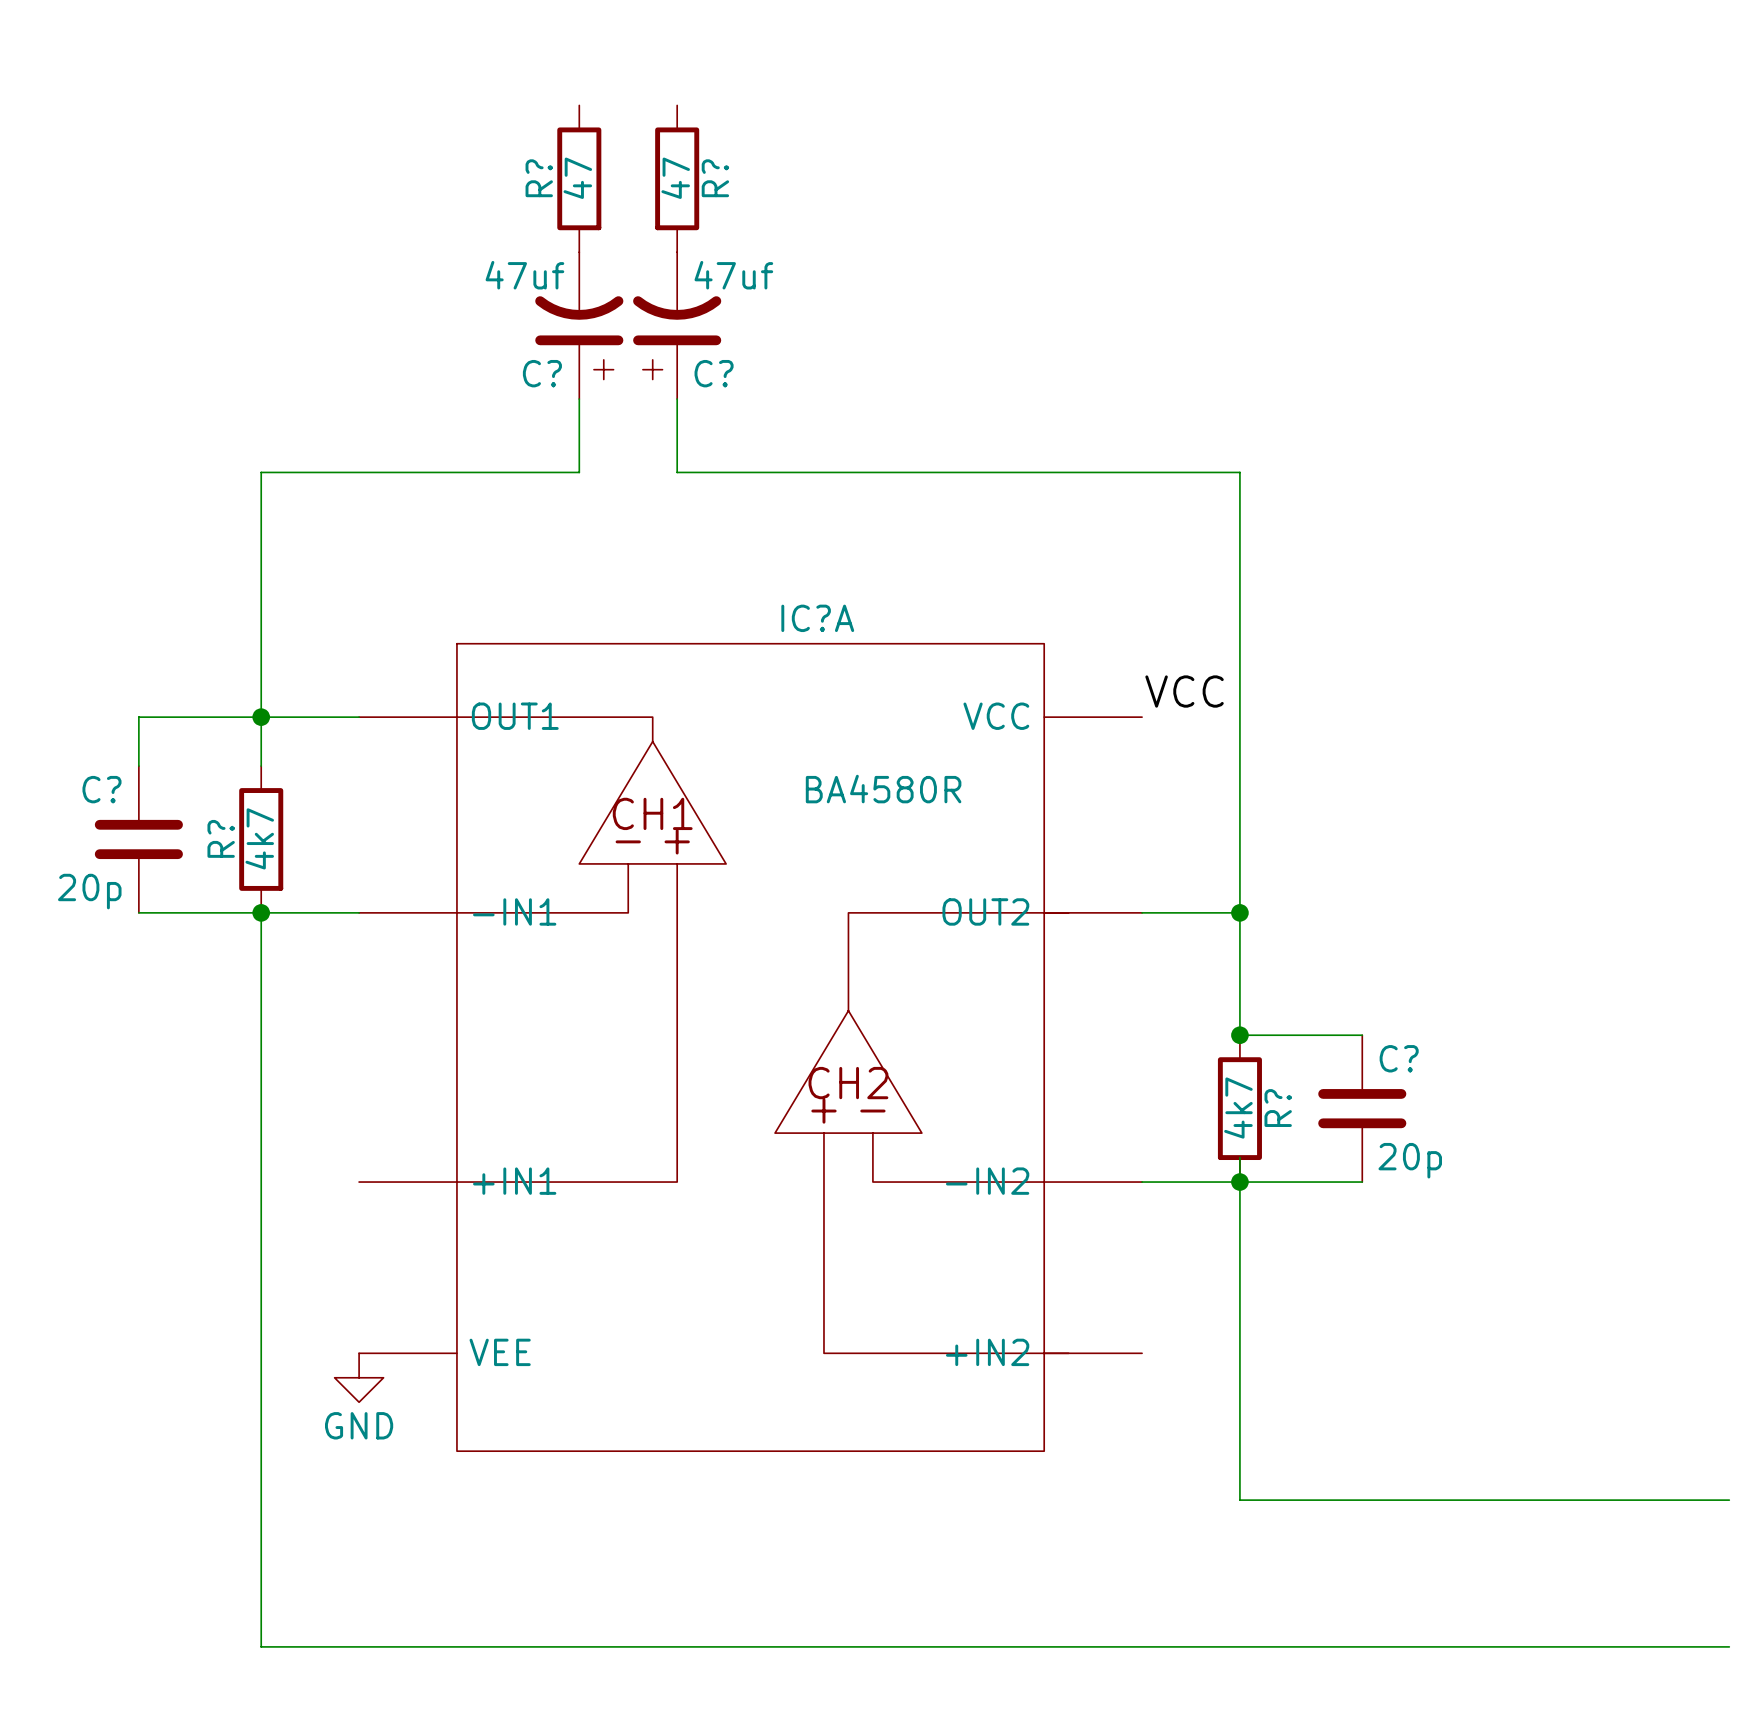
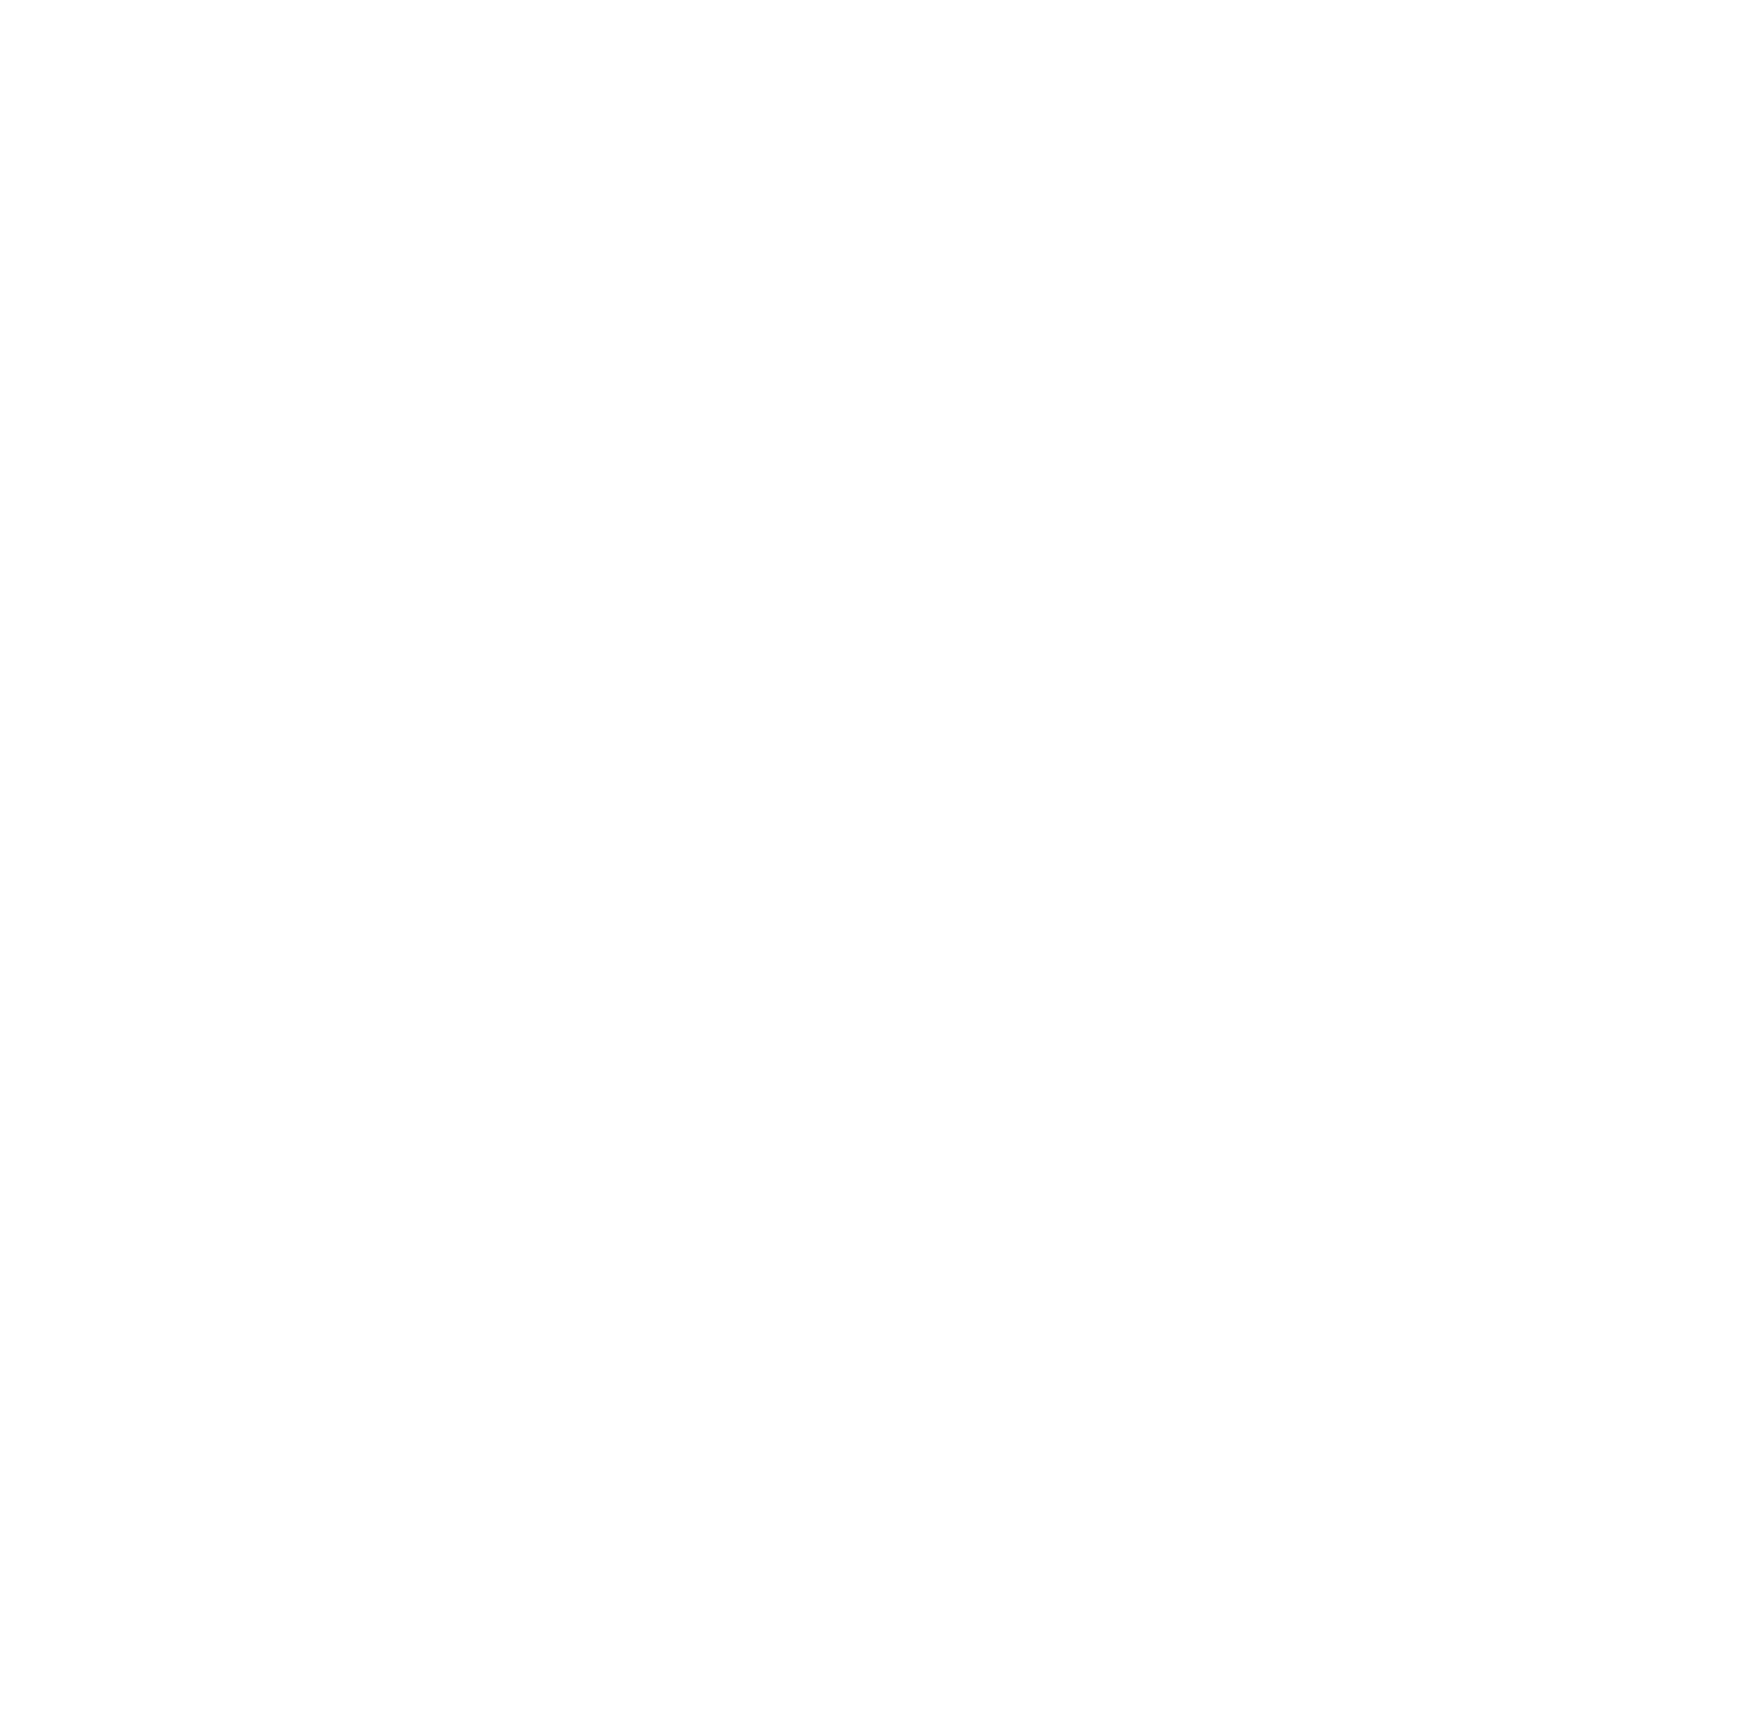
R?: 47 (579, 178) -> none
R?: 47 (677, 178) -> none
C?: 47uf (579, 325) -> none
C?: 47uf (677, 325) -> none
wire: (579, 399) (579, 472) (261, 472) (261, 766) -> none
wire: (677, 399) (677, 472) (1239, 472) (1239, 1035) (1362, 1035) -> none
label: VCC (1184, 691) -> none
junction: (261, 717) -> none
wire: (359, 717) (138, 717) (138, 766) -> none
C?: 20p (138, 839) -> none
R?: 4k7 (261, 839) -> none
wire: (138, 912) (359, 912) -> none
wire: (261, 912) (261, 1646) (1729, 1646) -> none
junction: (261, 912) -> none
wire: (1142, 912) (1239, 912) -> none
junction: (1239, 912) -> none
junction: (1239, 1035) -> none
IC?A: BA4580R (750, 1047) -> none
R?: 4k7 (1239, 1108) -> none
C?: 20p (1362, 1108) -> none
wire: (1239, 1157) (1239, 1500) (1729, 1500) -> none
wire: (1142, 1182) (1362, 1182) -> none
junction: (1239, 1182) -> none
power symbol: GND (359, 1377) -> none

